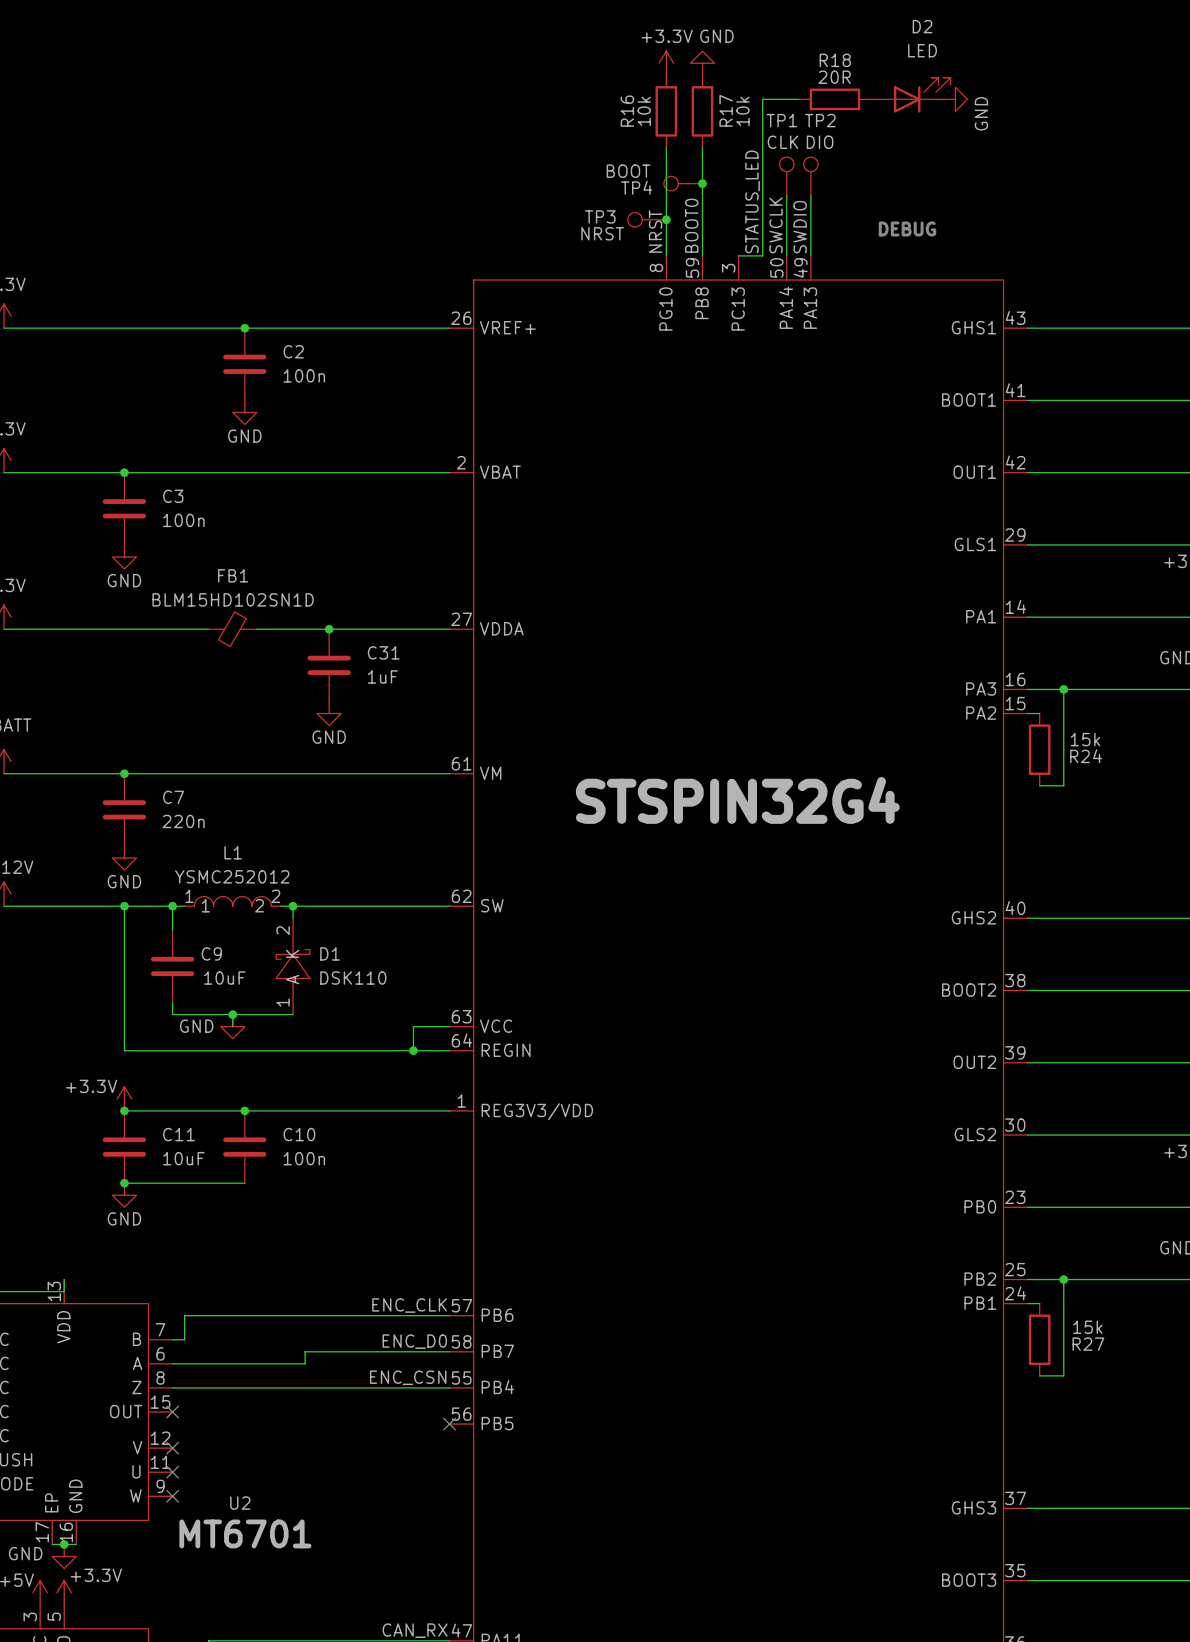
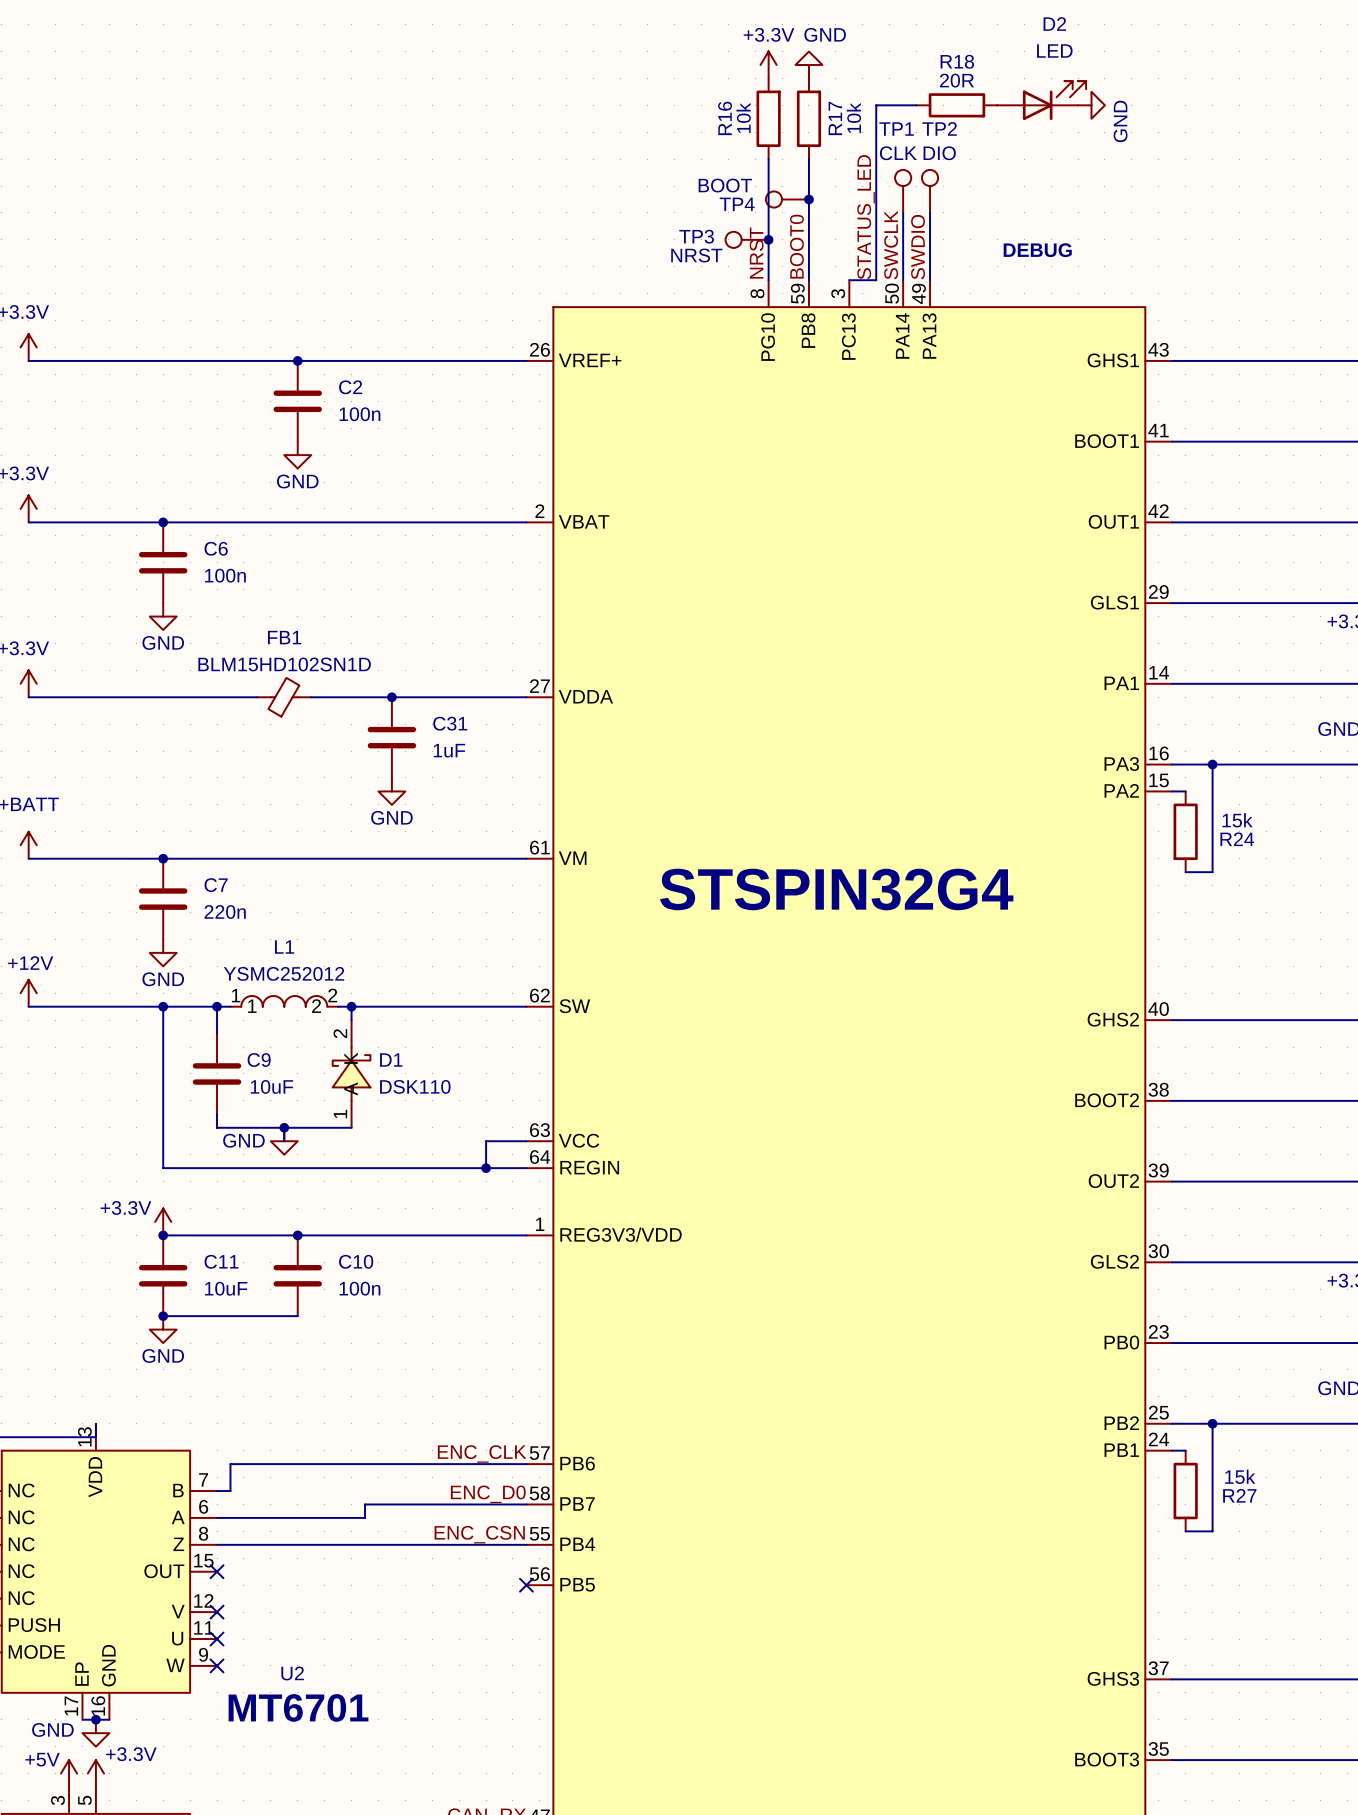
C3 name: C3 (173, 496) -> C6 (216, 548)

